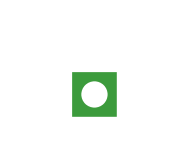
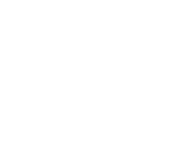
part: (94, 94) -> none

